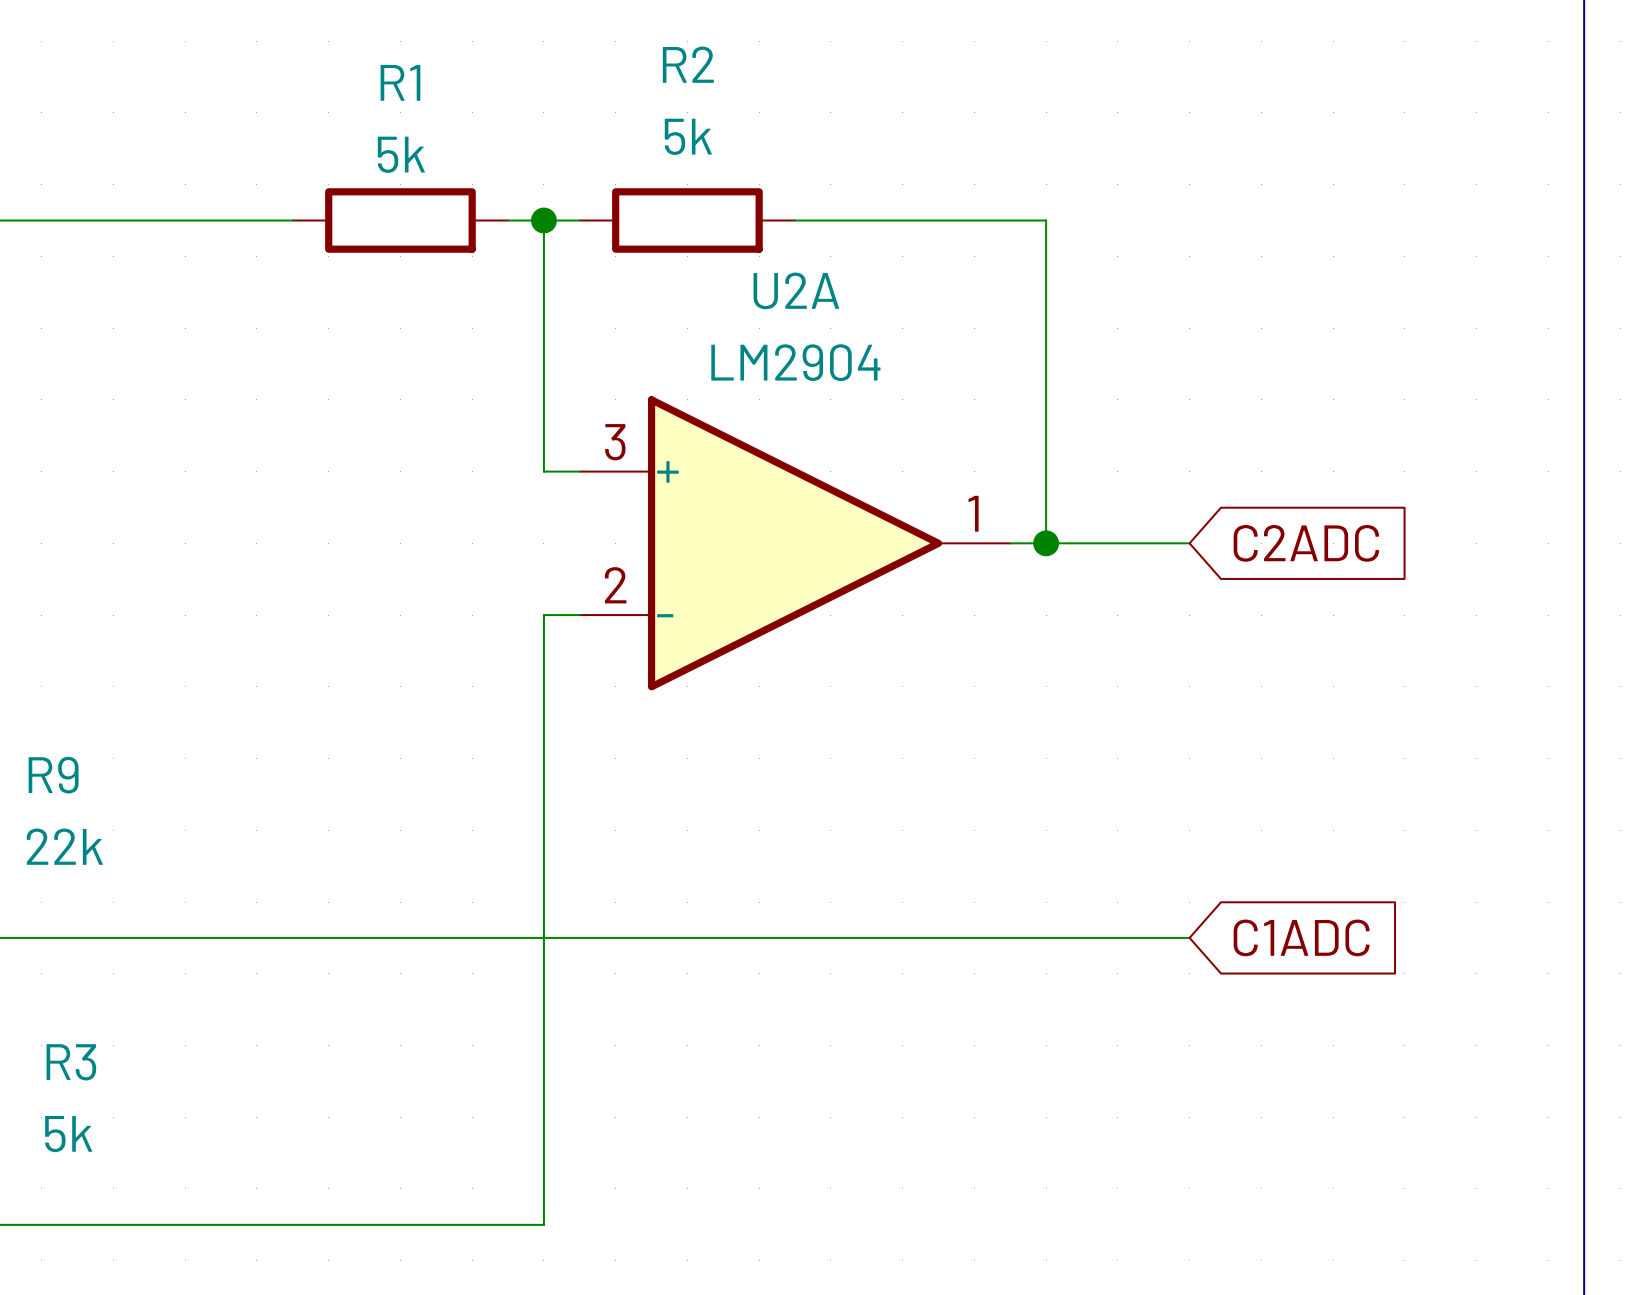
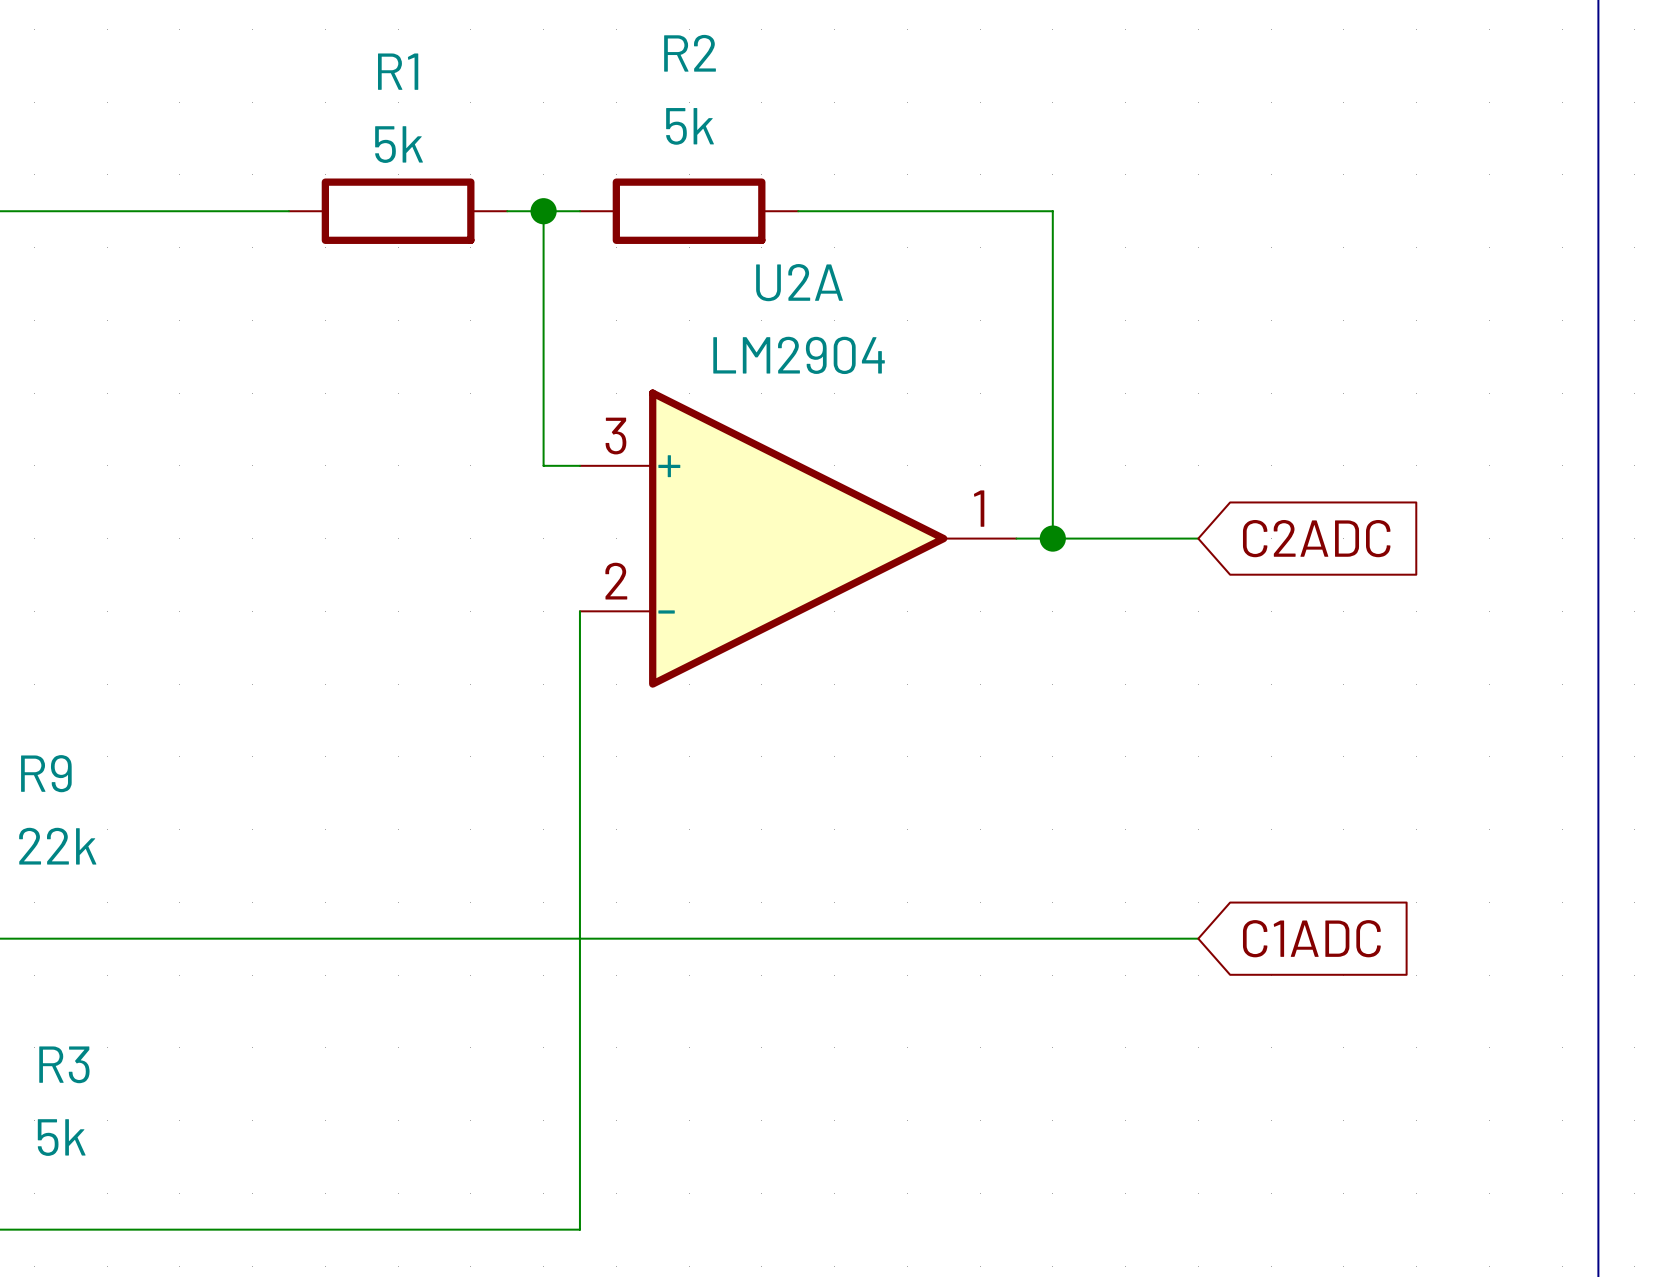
wire: (579, 615) (543, 615) (543, 1224) -> (579, 611) (579, 1229) (543, 1229)

